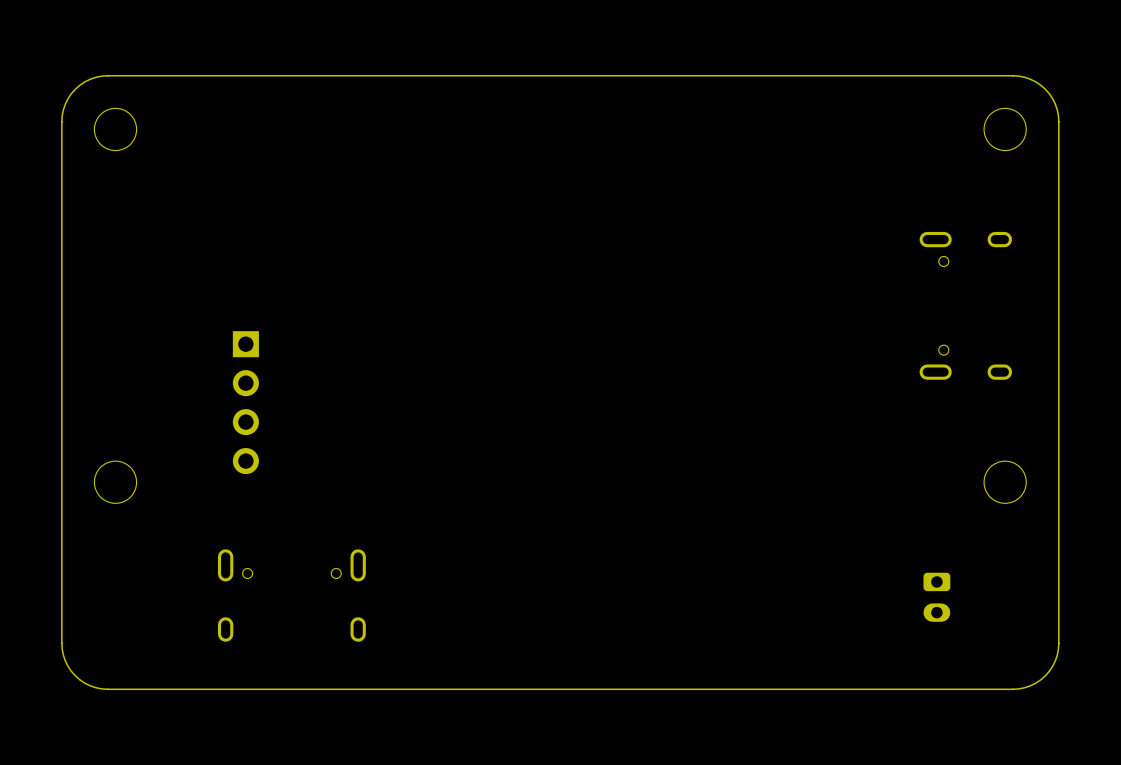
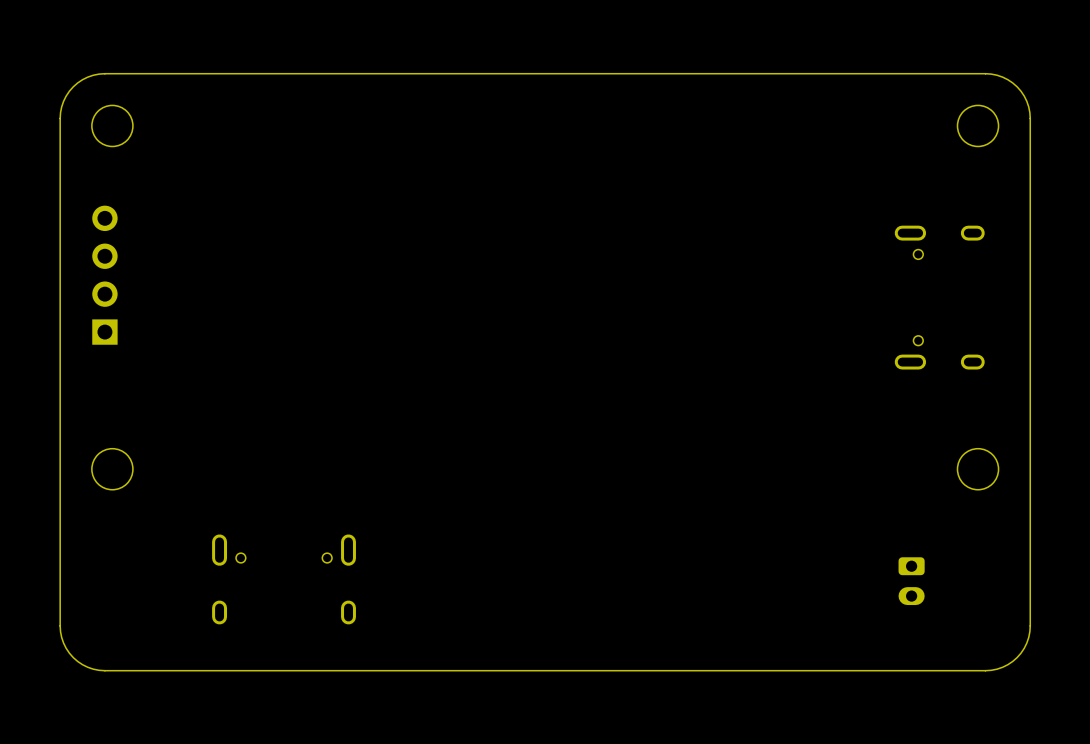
part rotation: 0° (245, 402) -> 180° (104, 275)
part position: (245, 402) -> (104, 275)

